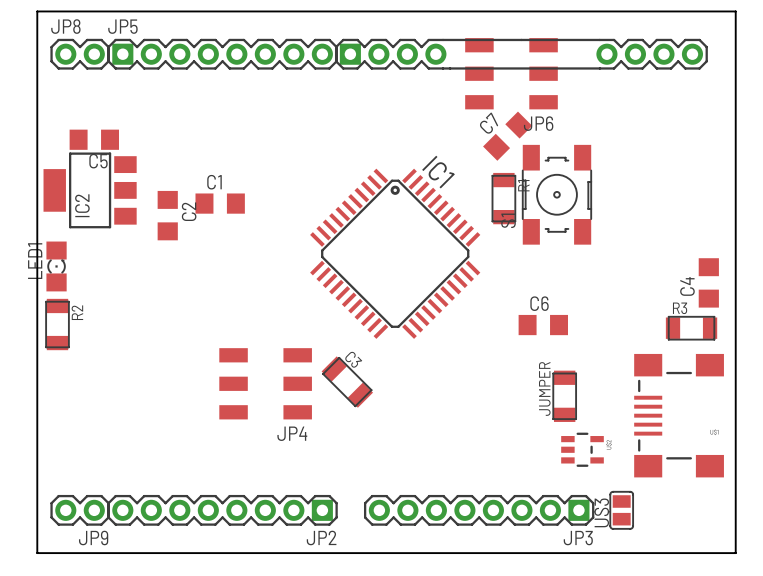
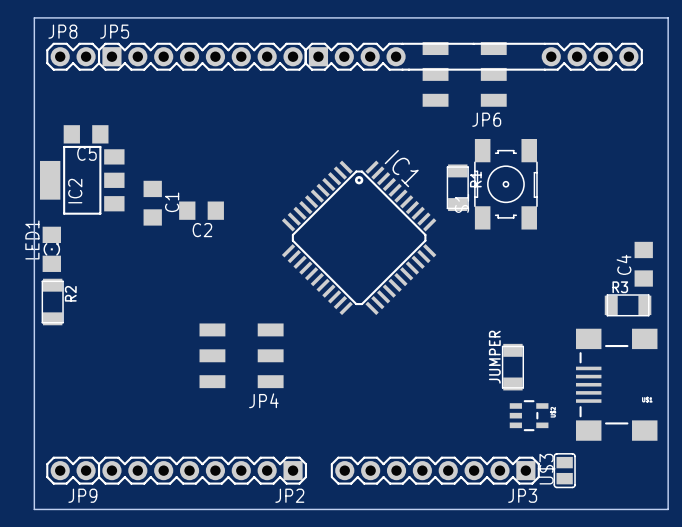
C7: (507, 136) -> none
C1: (220, 203) -> none
C2 name: C2 (189, 211) -> C1 (172, 202)
C2: none -> (201, 210)
C6: (543, 325) -> none
C3: (347, 382) -> none

